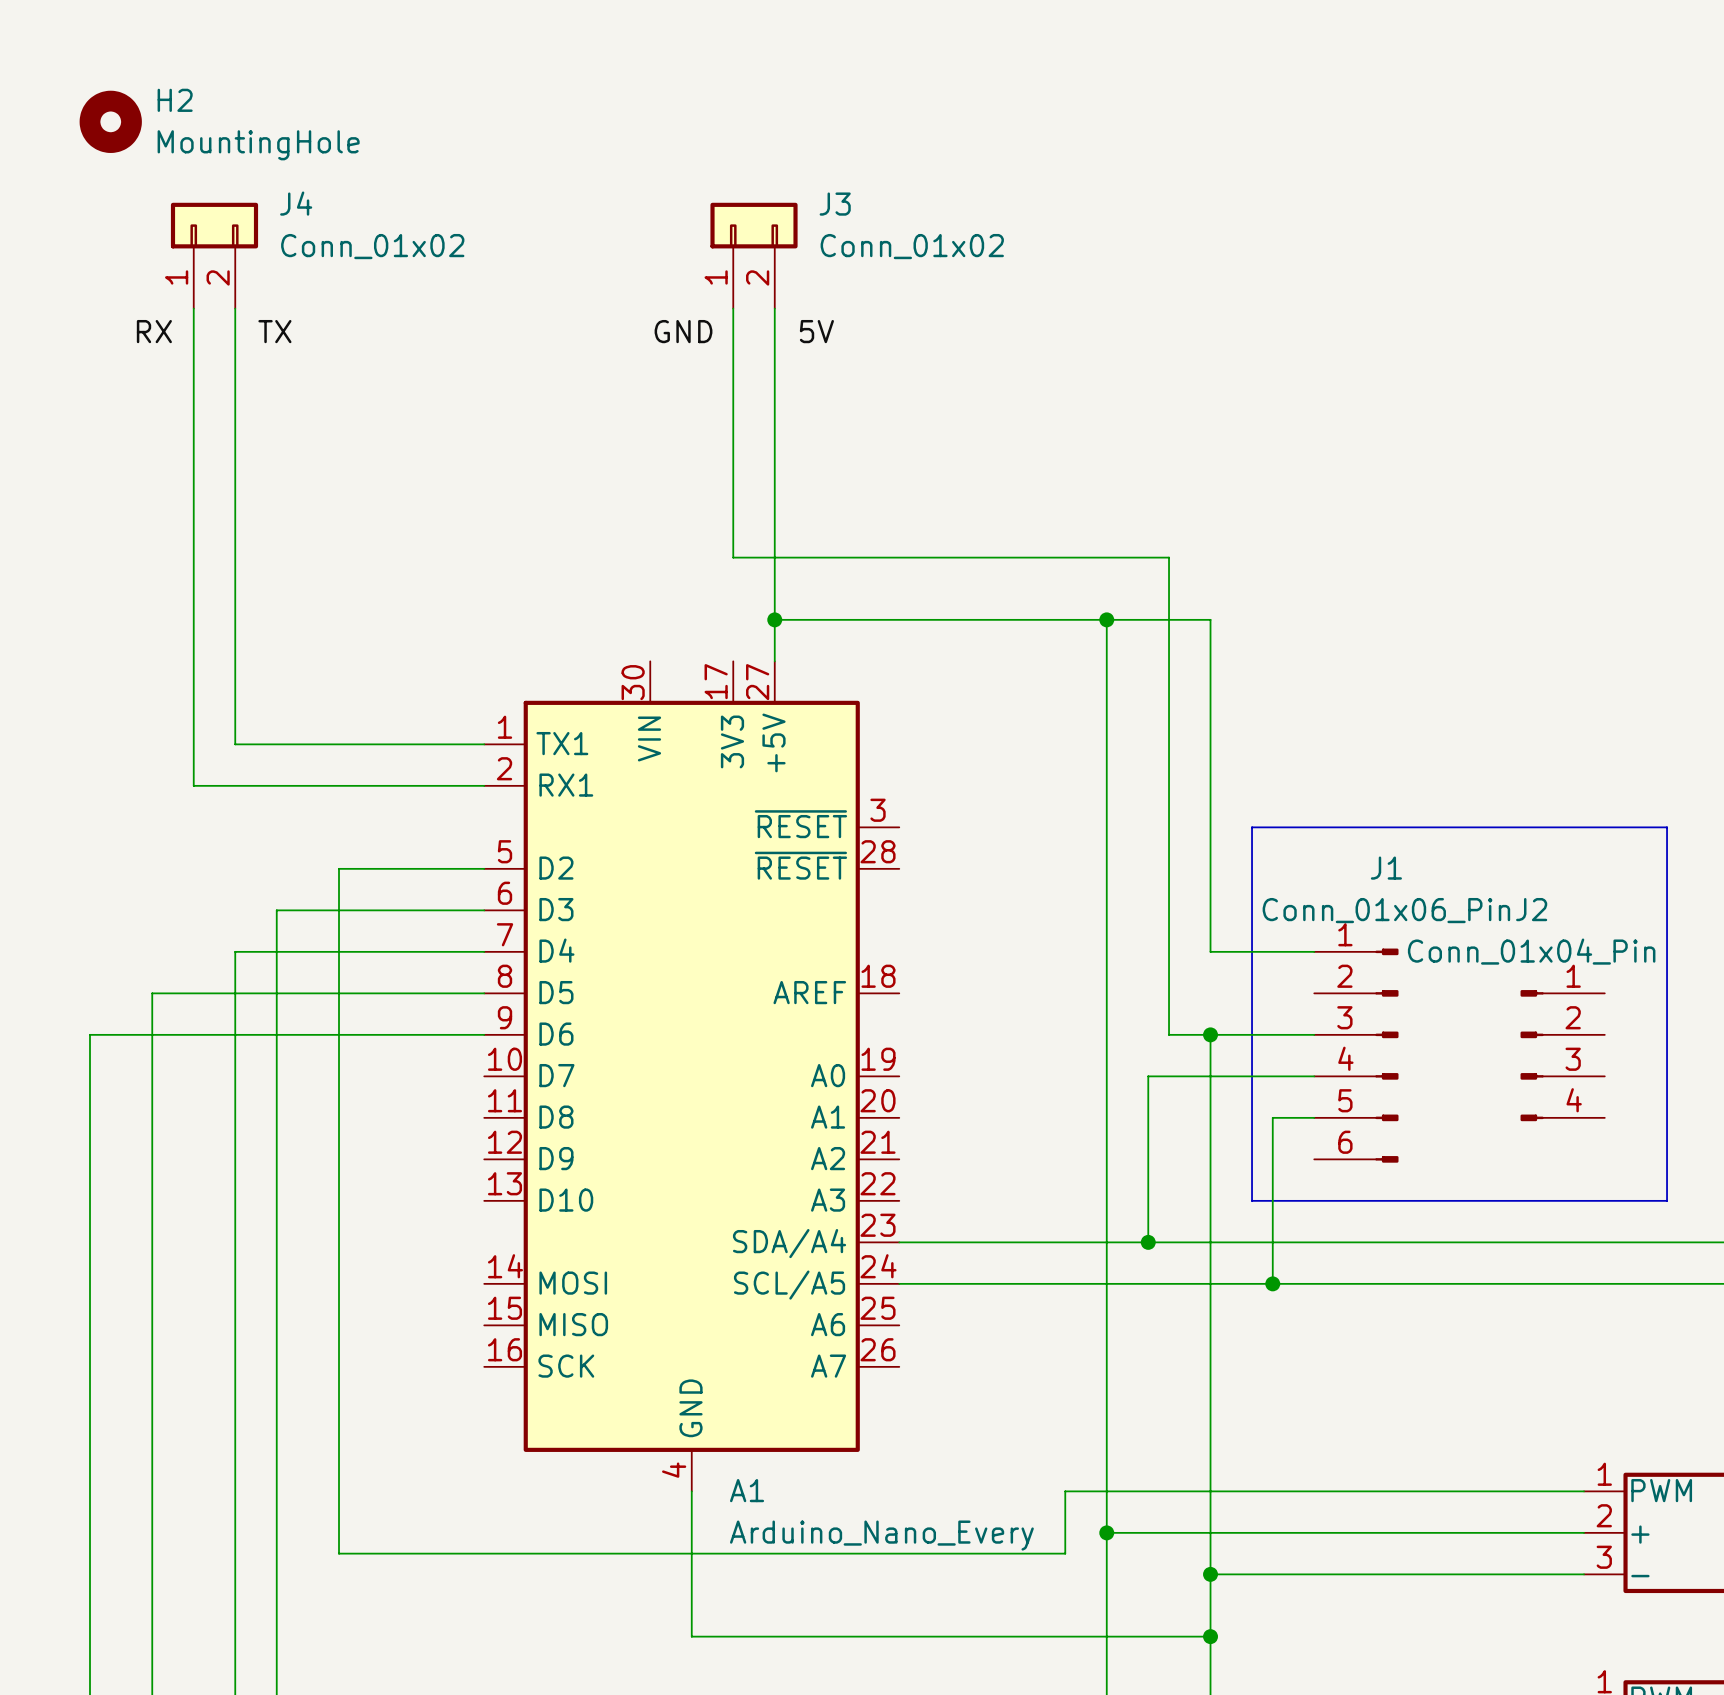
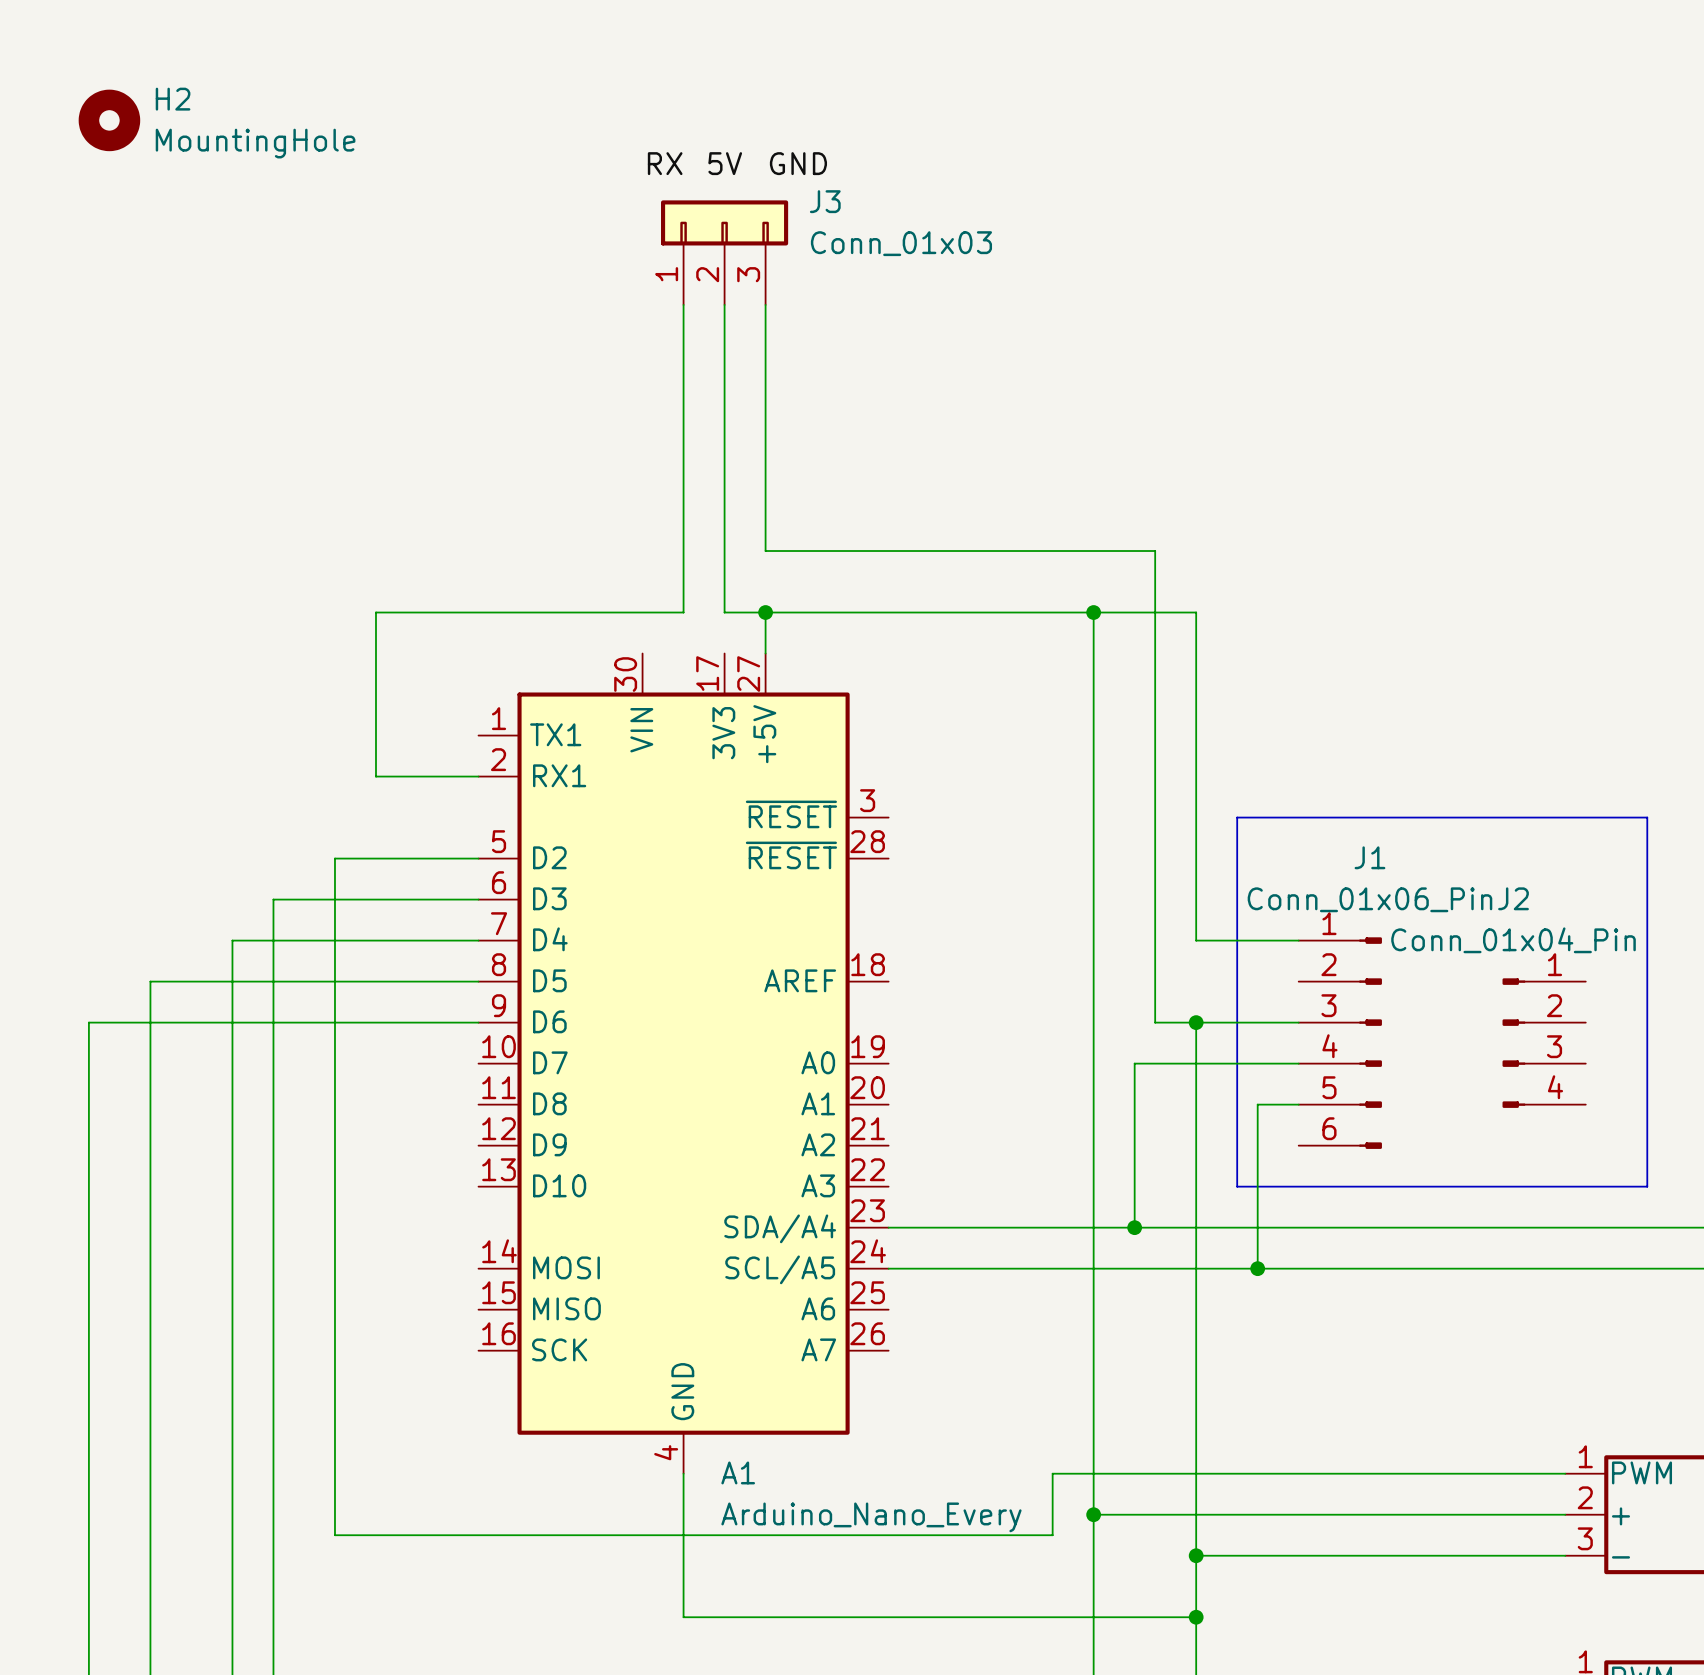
label: none -> RX (665, 163)
J3 symbol: [710, 202, 798, 309] -> [661, 200, 789, 305]
J3 value: Conn_01x02 (912, 246) -> Conn_01x03 (901, 243)
J4: Conn_01x02 (214, 255) -> none
wire: (193, 308) (193, 785) (380, 785) -> (683, 304) (683, 612) (375, 612) (375, 776)
wire: (235, 308) (235, 744) (484, 744) -> none
label: RX (154, 331) -> none
label: TX (274, 331) -> none
label position: GND (683, 331) -> GND (798, 163)
label position: 5V (816, 331) -> 5V (725, 163)
wire: (733, 557) (774, 557) (774, 619) -> (724, 551) (724, 612) (765, 612)

